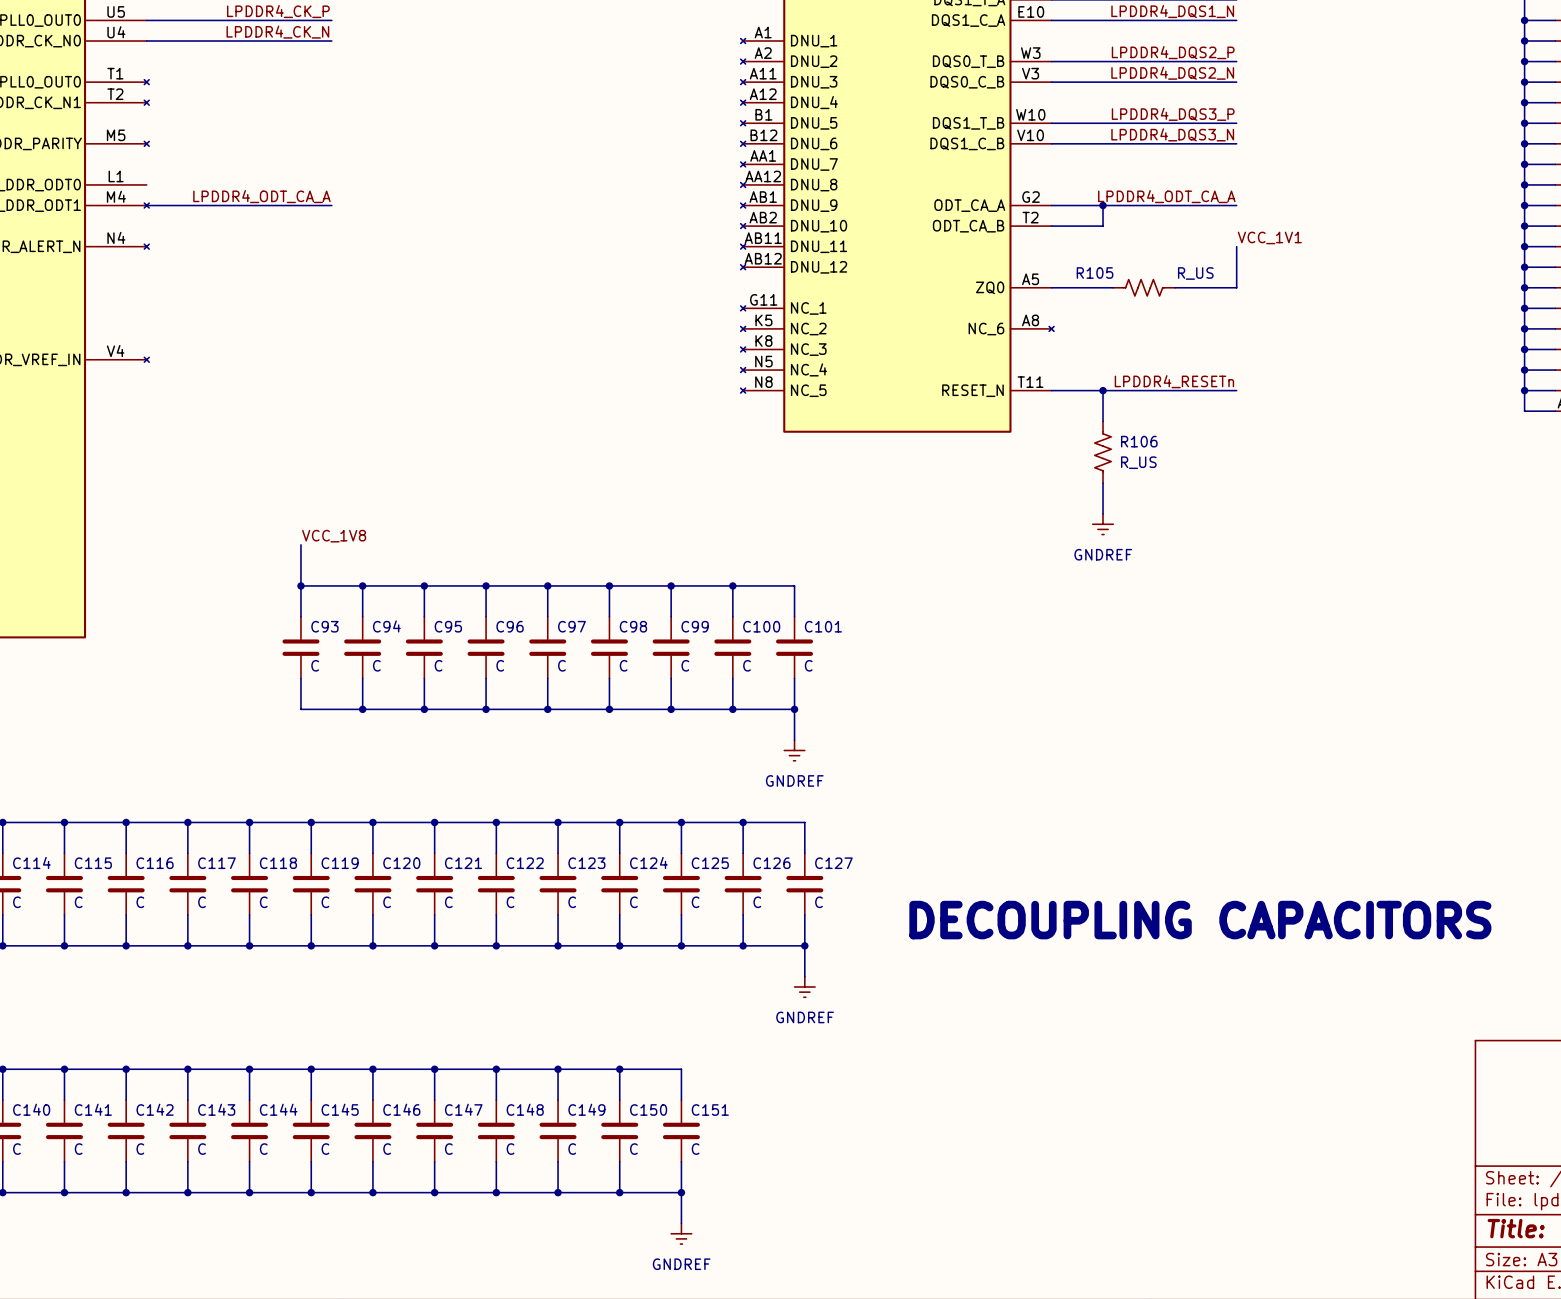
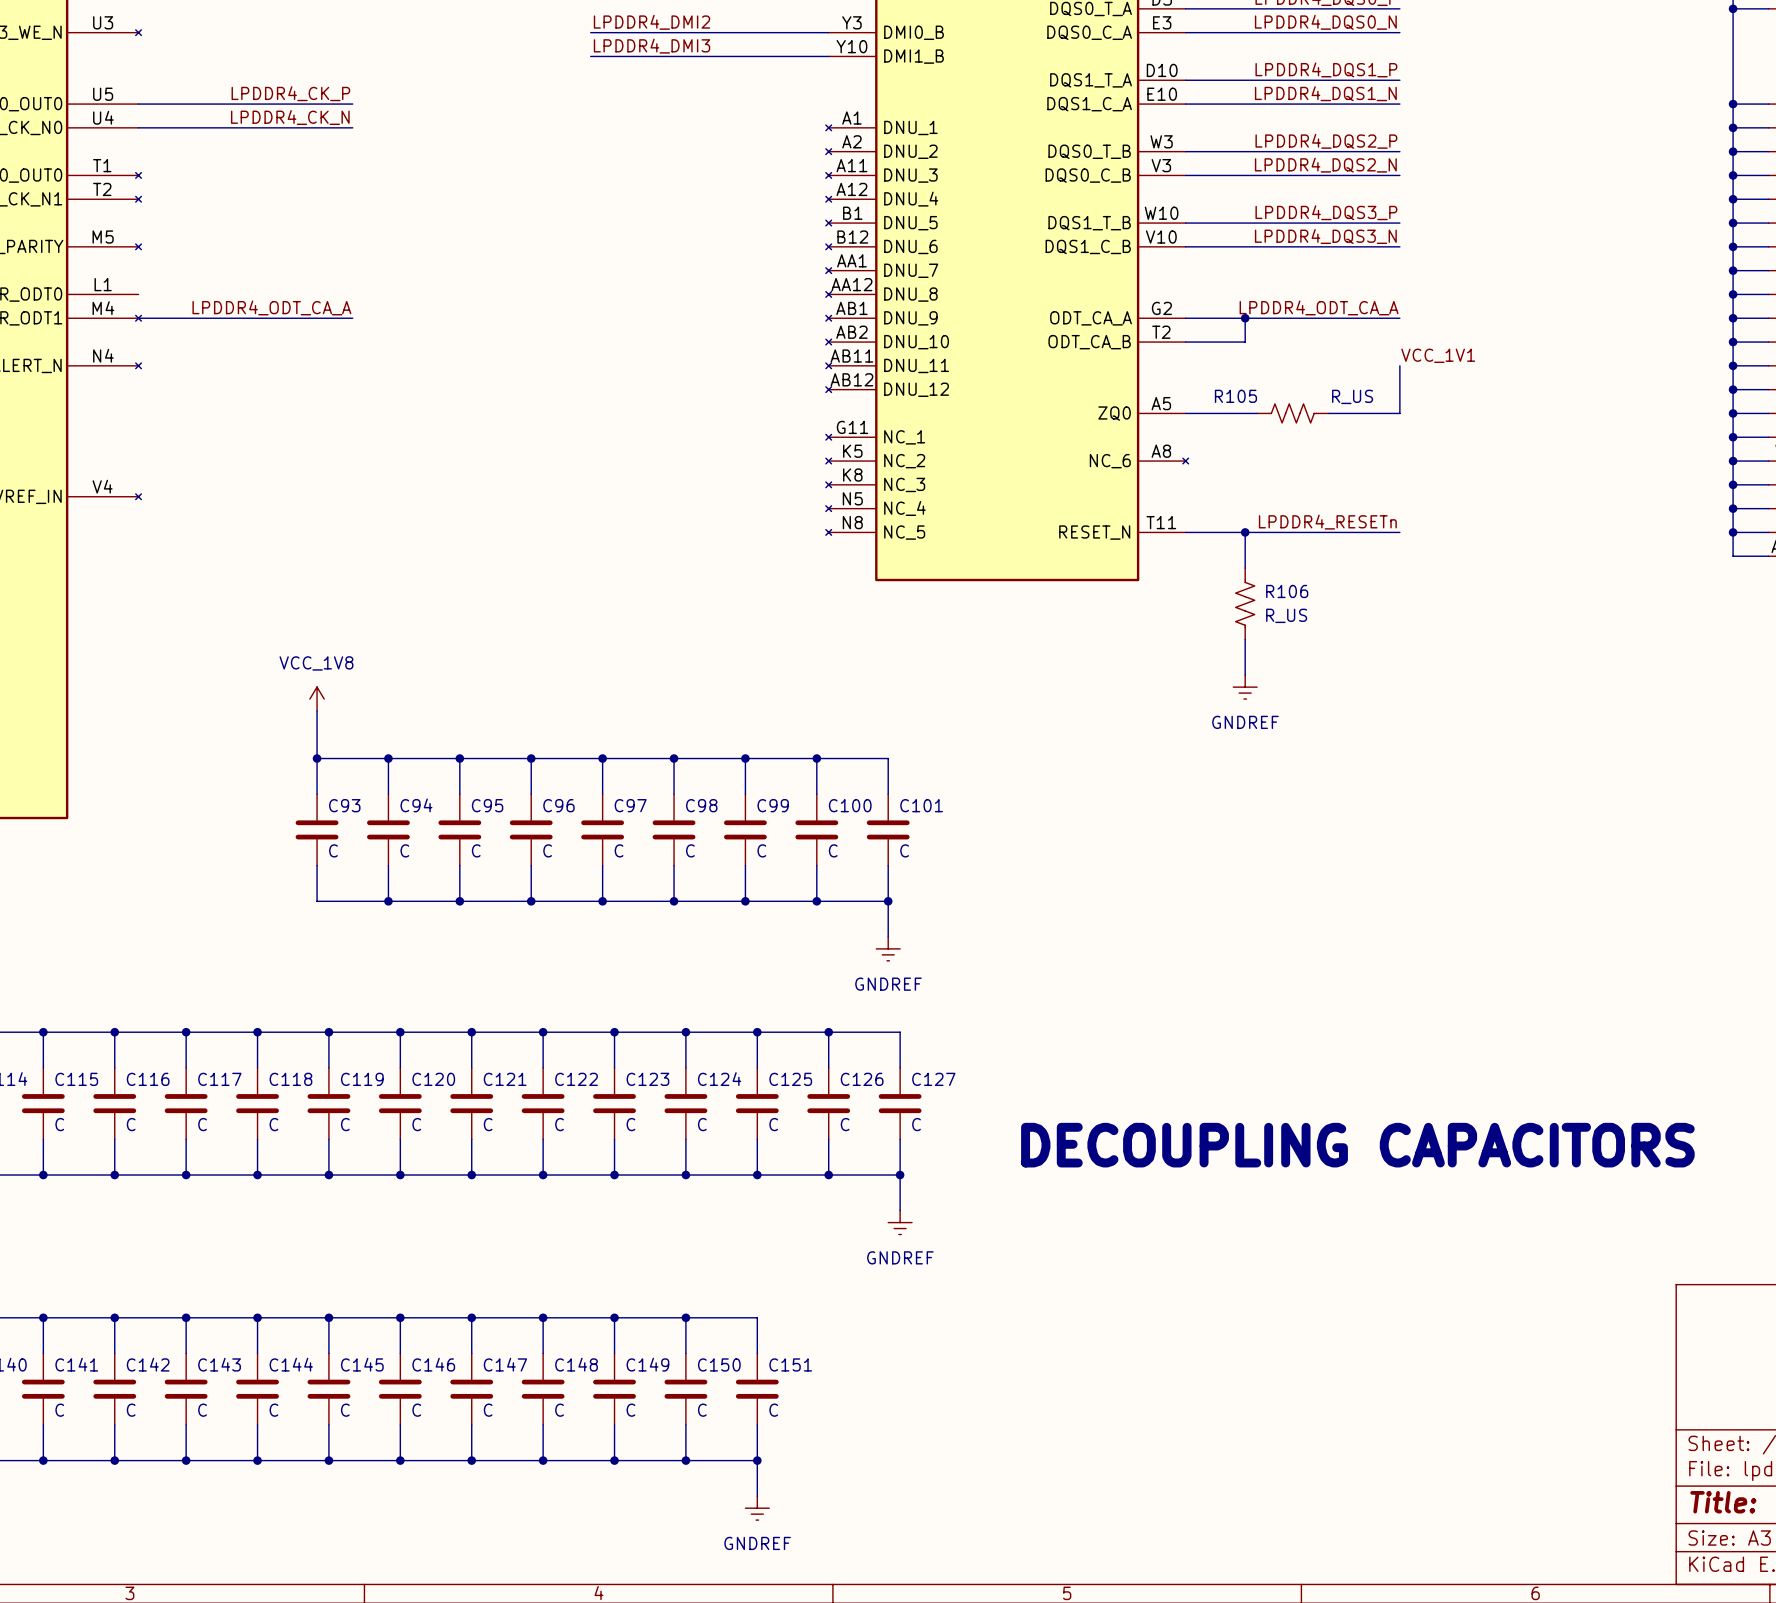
power symbol: none -> VCC_1V8 (317, 699)
label: VCC_1V8 (334, 536) -> none

